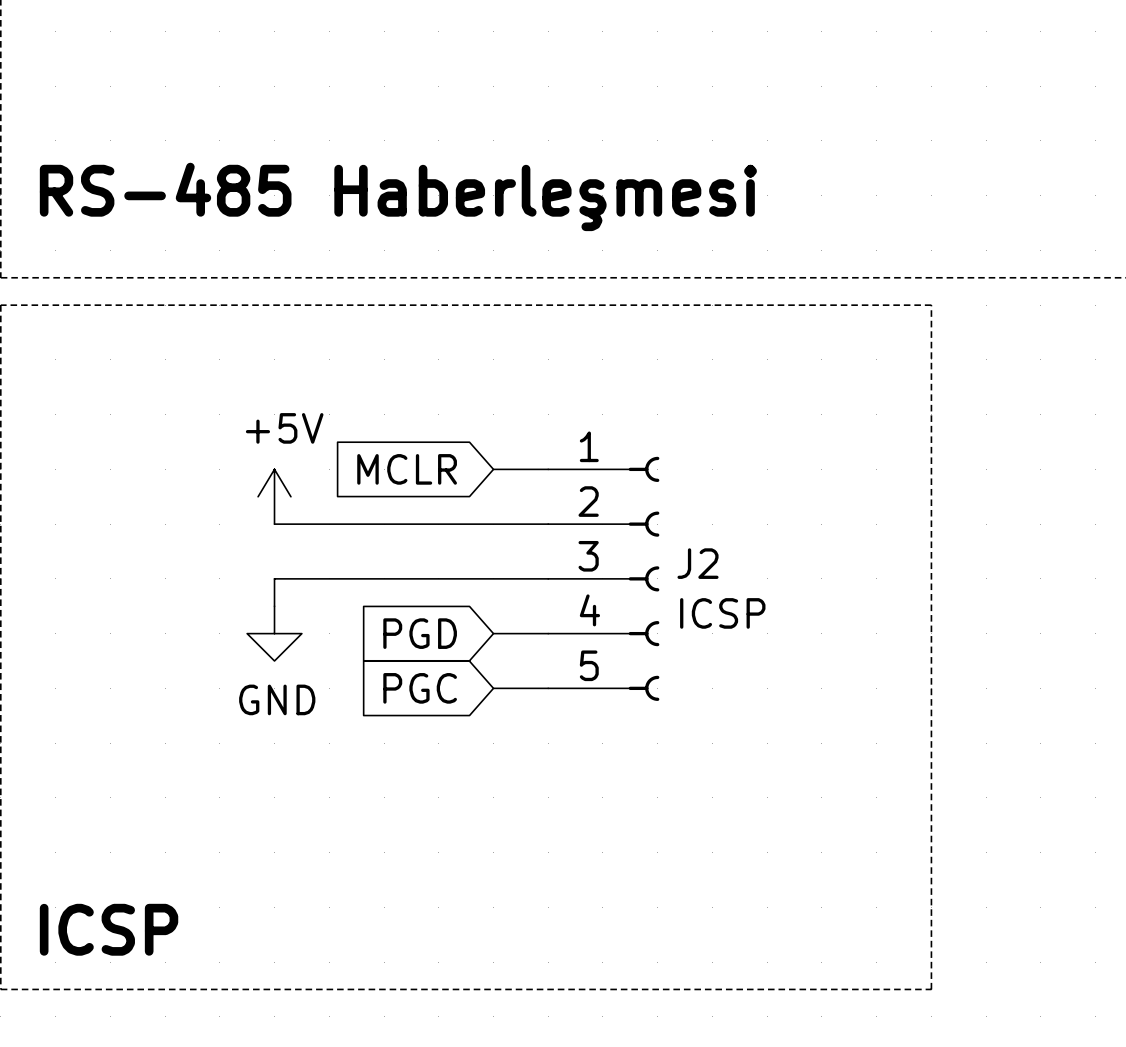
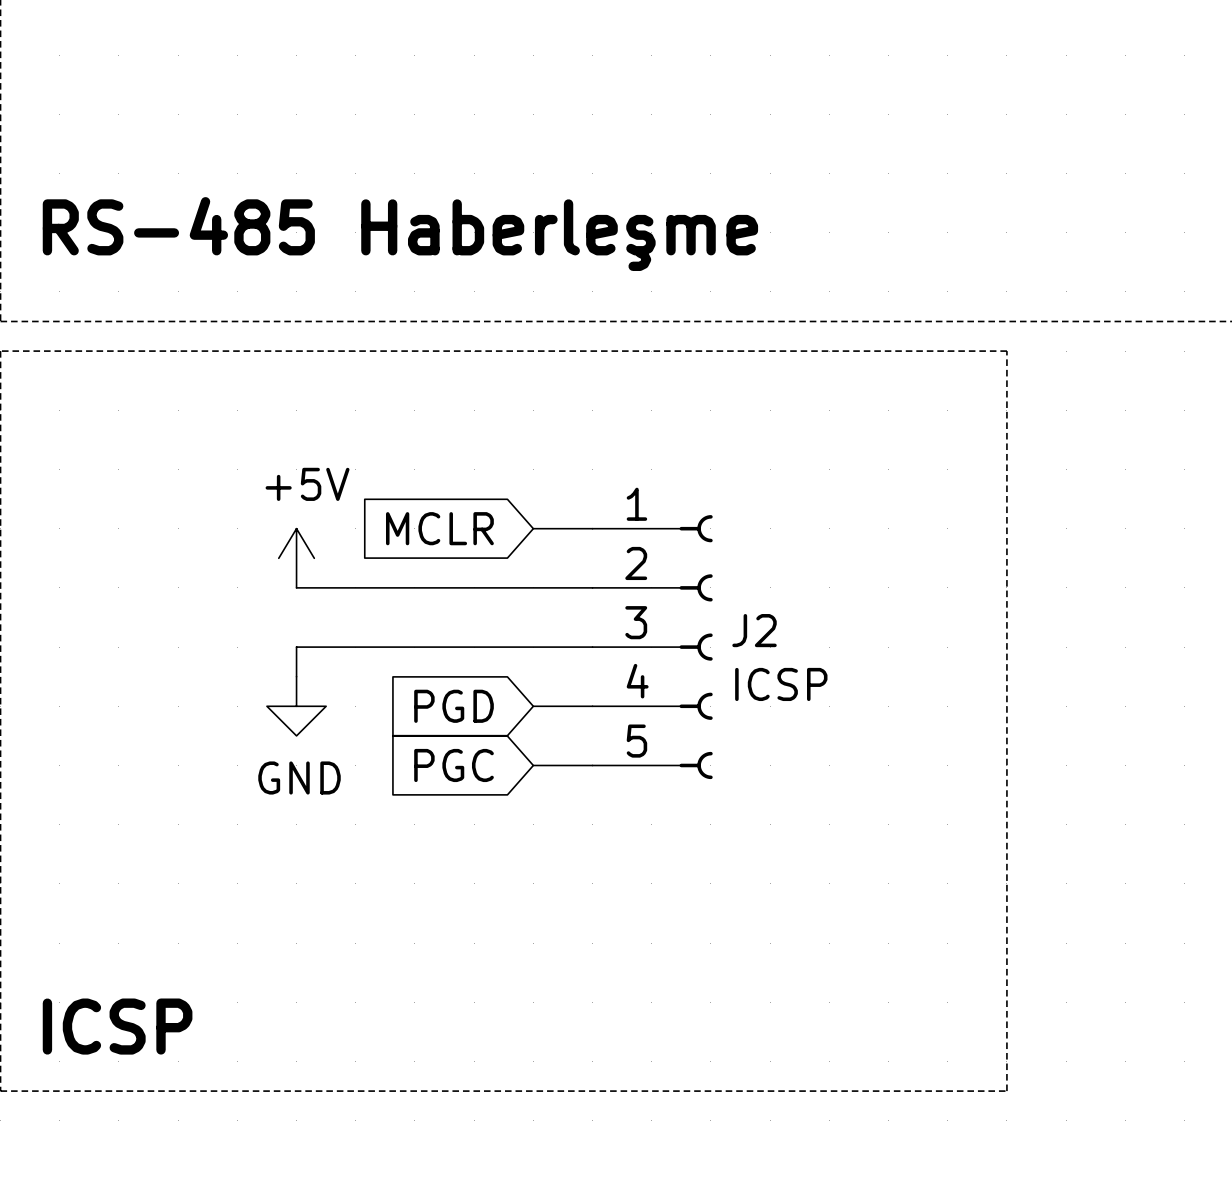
text: RS-485 Haberleşmesi (398, 196) -> RS-485 Haberleşme (400, 234)

